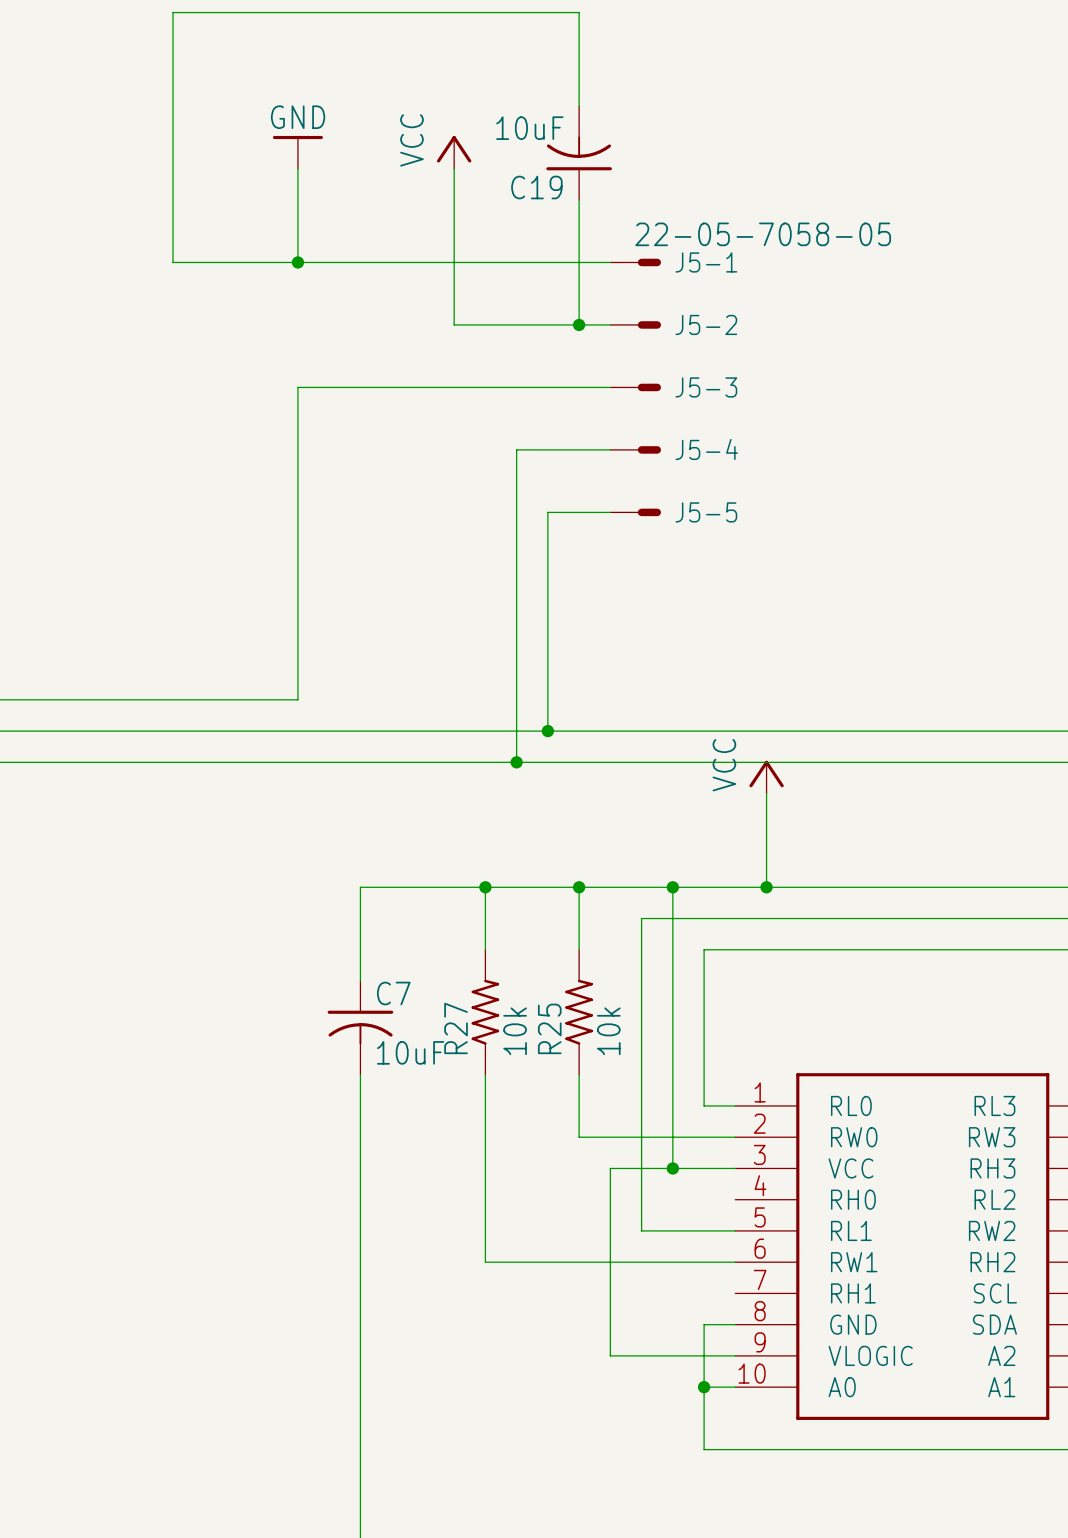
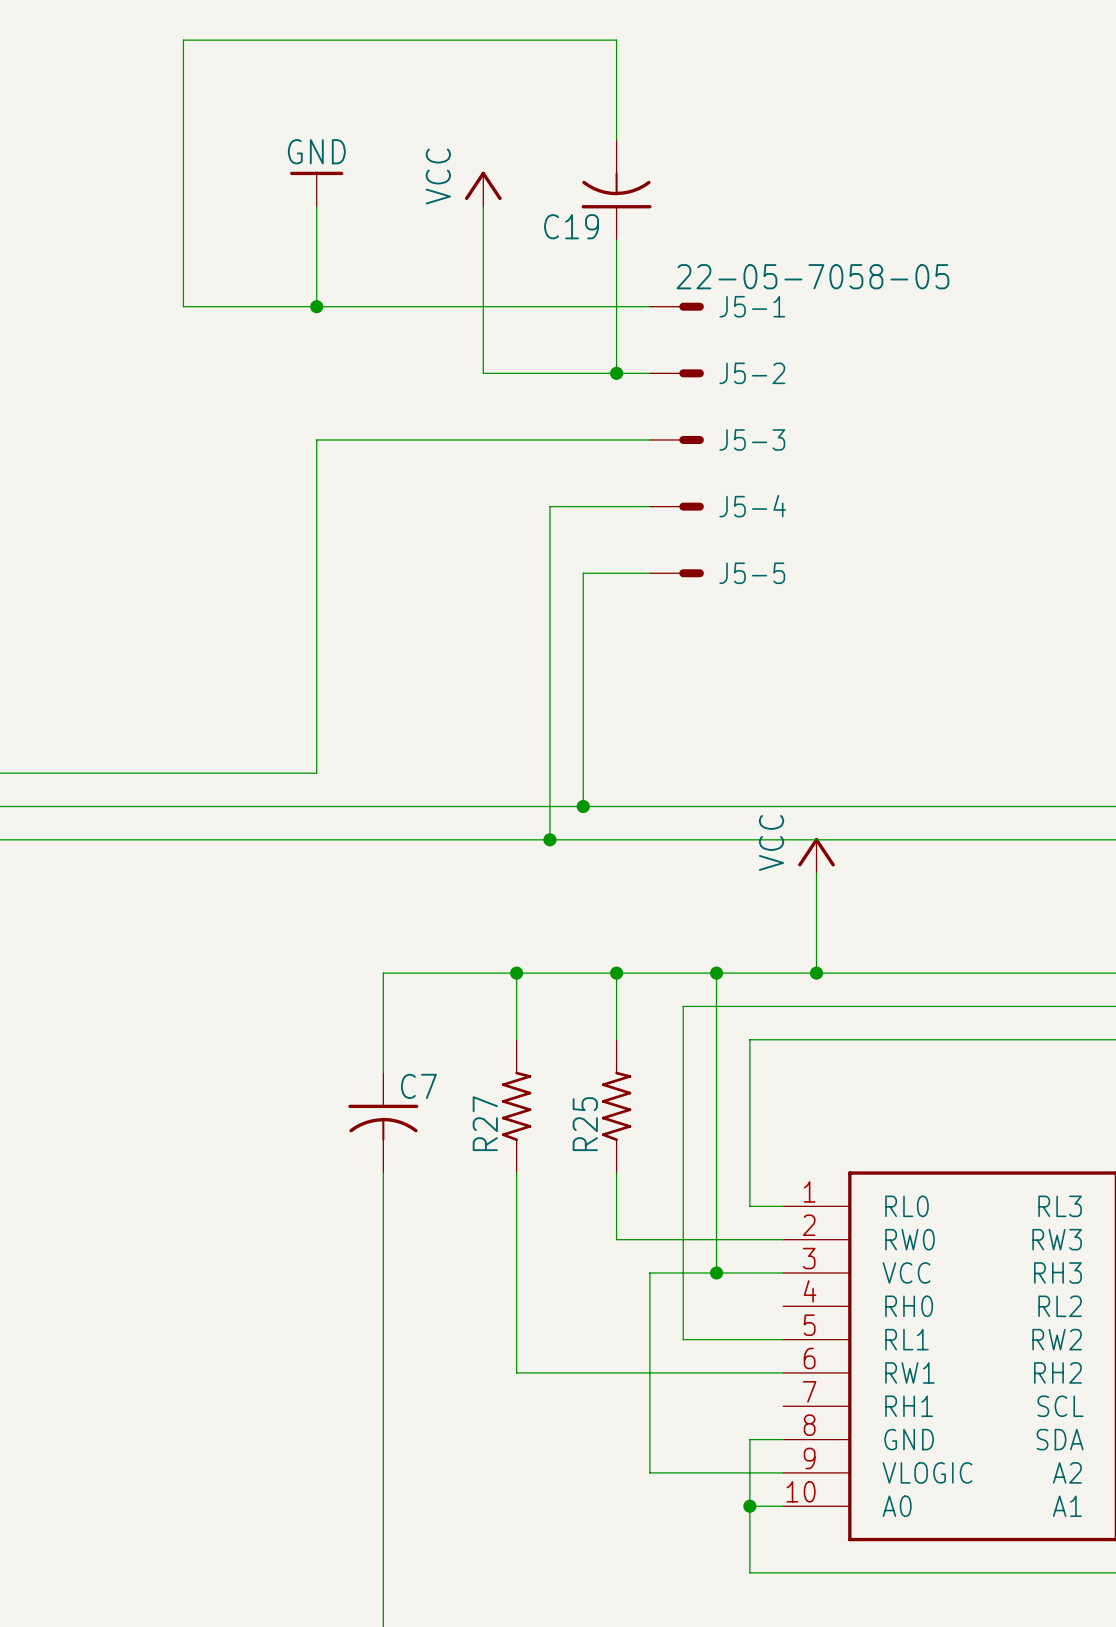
C19 value: 10uF (529, 128) -> none
R27 value: 10k (515, 1031) -> none
R25 value: 10k (608, 1031) -> none
C7 value: 10uF (410, 1052) -> none

